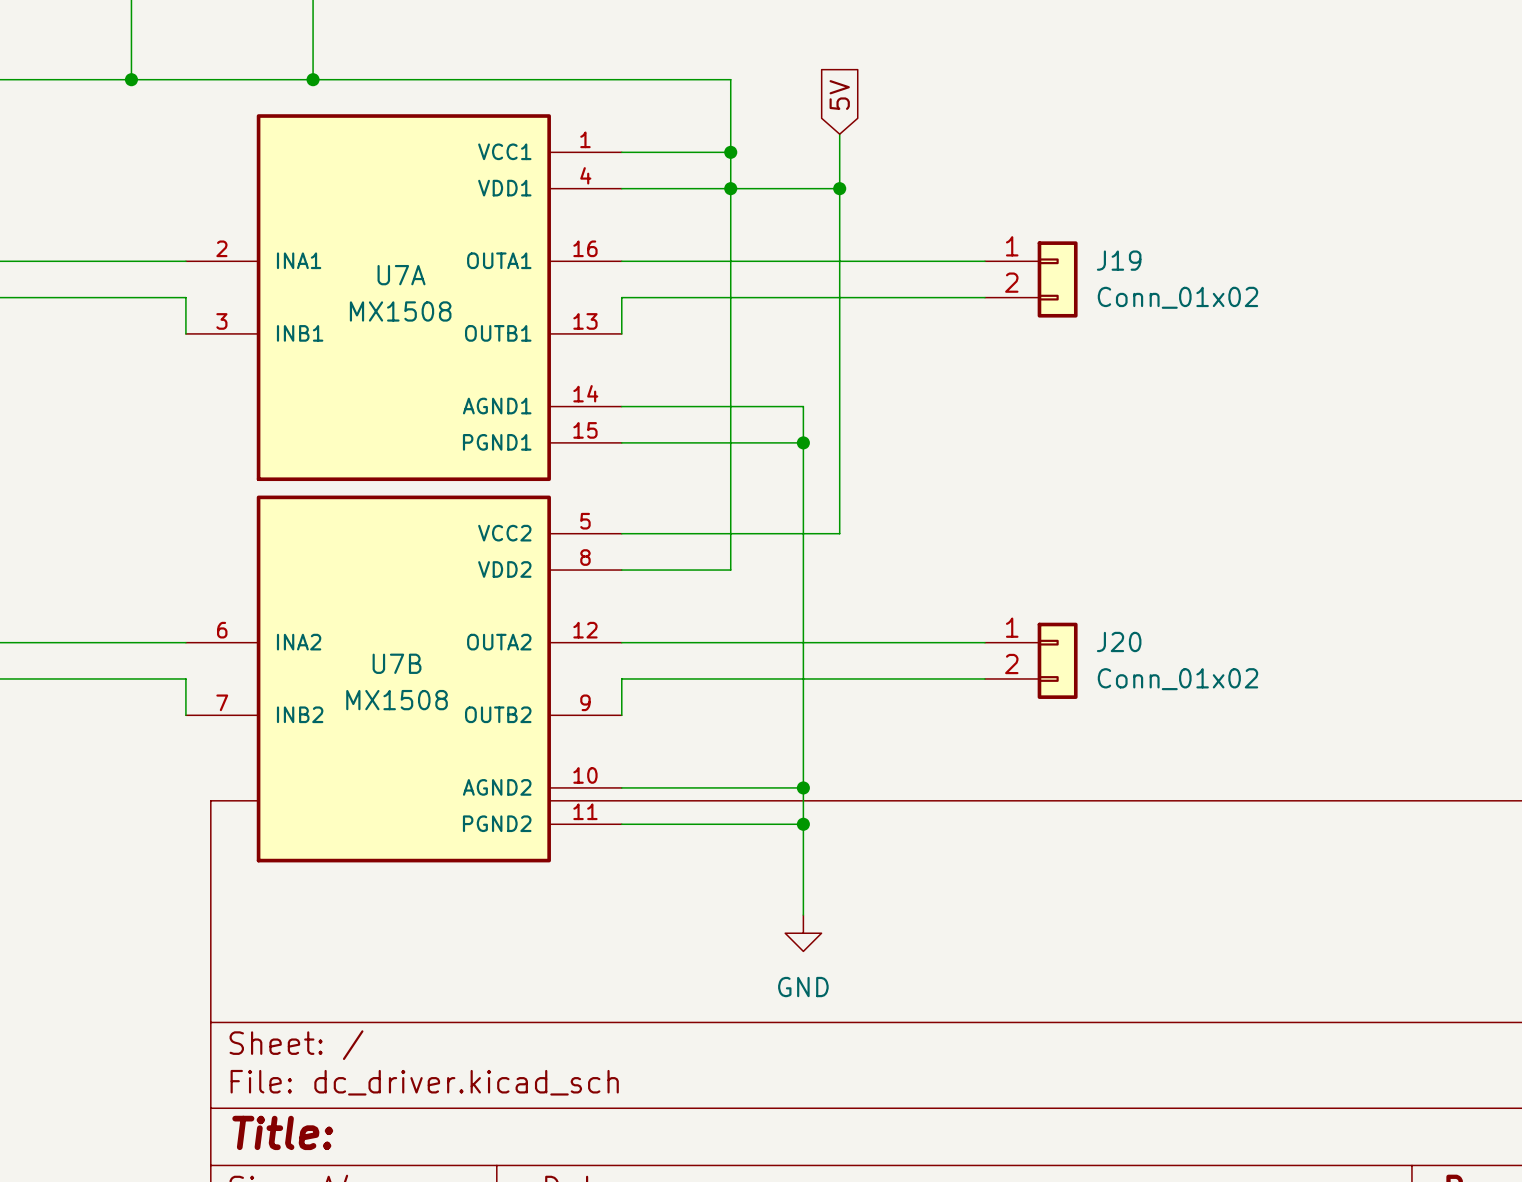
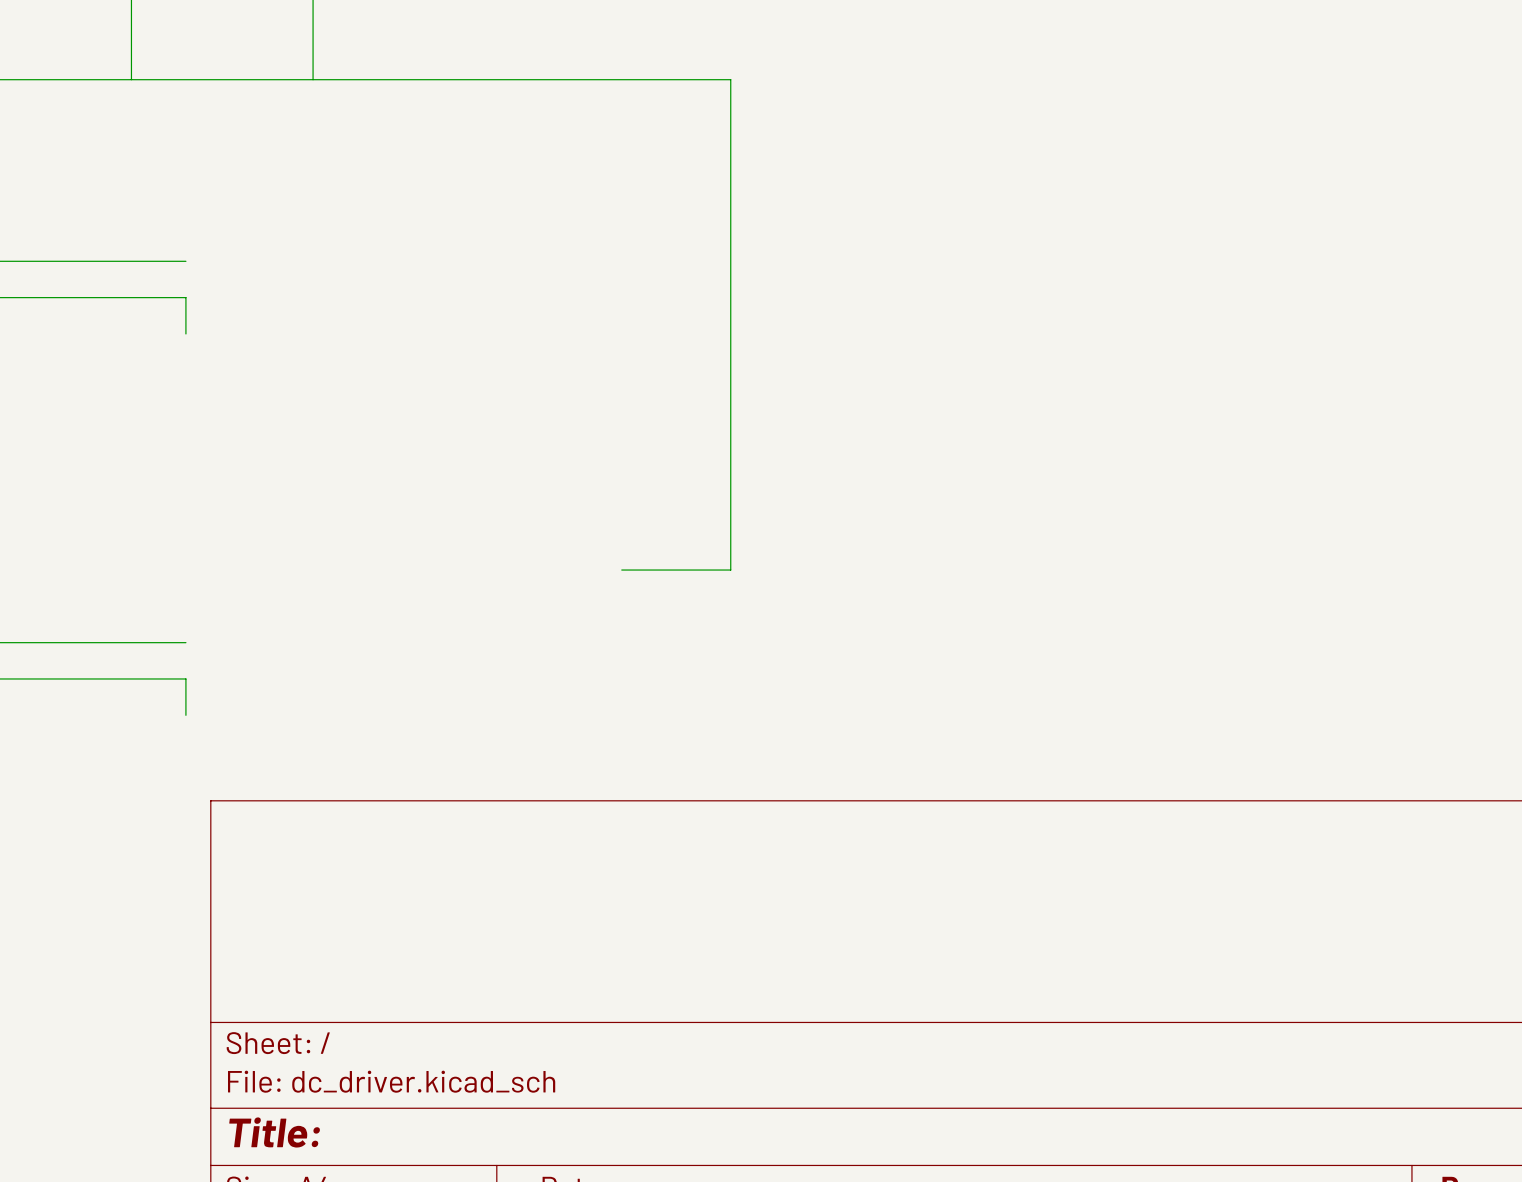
junction: (131, 79) -> none
junction: (313, 79) -> none
global label: 5V (839, 95) -> none
wire: (839, 134) (839, 533) (621, 533) -> none
wire: (621, 152) (730, 152) -> none
junction: (730, 152) -> none
wire: (621, 188) (839, 188) -> none
junction: (730, 188) -> none
junction: (839, 188) -> none
wire: (621, 261) (984, 261) -> none
J19: Conn_01x02 (1031, 279) -> none
U7A: MX1508 (403, 297) -> none
wire: (984, 297) (621, 297) (621, 333) -> none
wire: (621, 406) (803, 406) (803, 915) -> none
wire: (621, 442) (803, 442) -> none
junction: (803, 442) -> none
wire: (621, 642) (984, 642) -> none
J20: Conn_01x02 (1031, 660) -> none
U7B: MX1508 (403, 678) -> none
wire: (984, 678) (621, 678) (621, 715) -> none
wire: (621, 787) (803, 787) -> none
junction: (803, 787) -> none
wire: (621, 824) (803, 824) -> none
junction: (803, 824) -> none
power symbol: GND (803, 933) -> none

